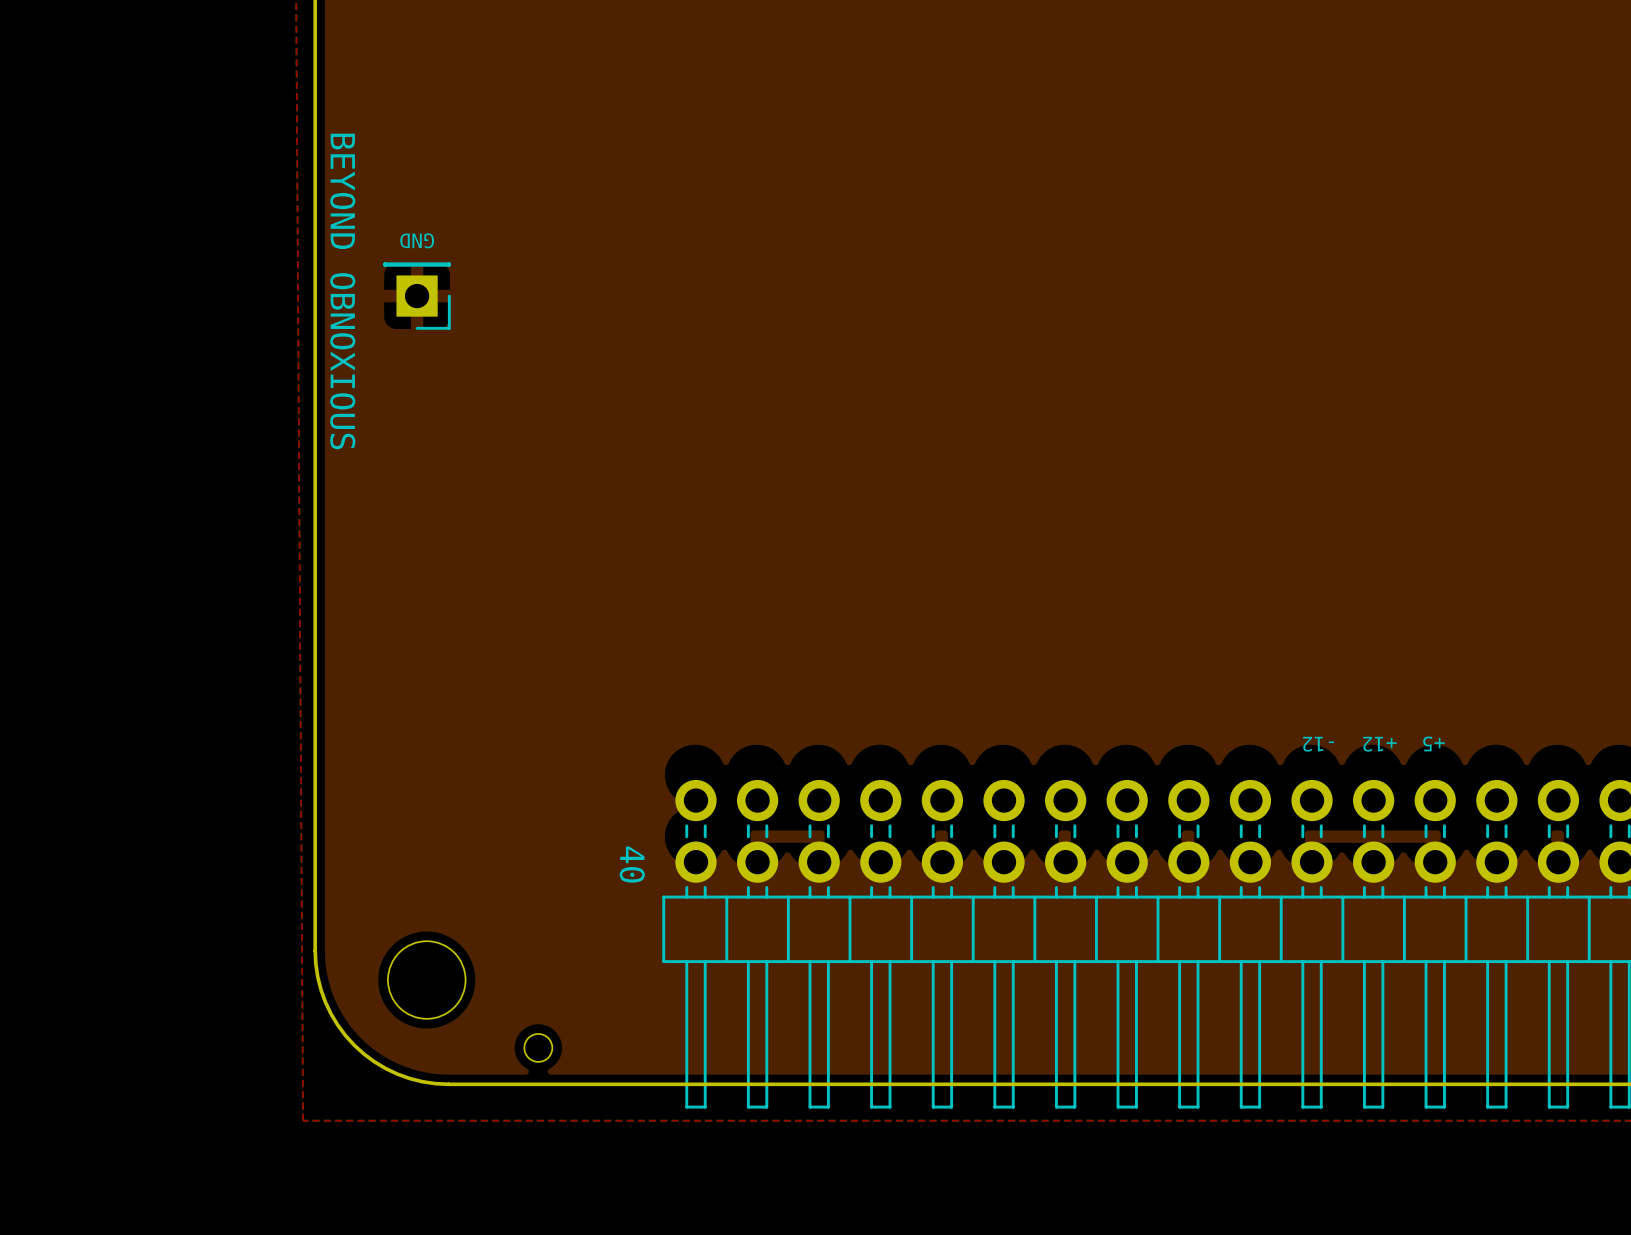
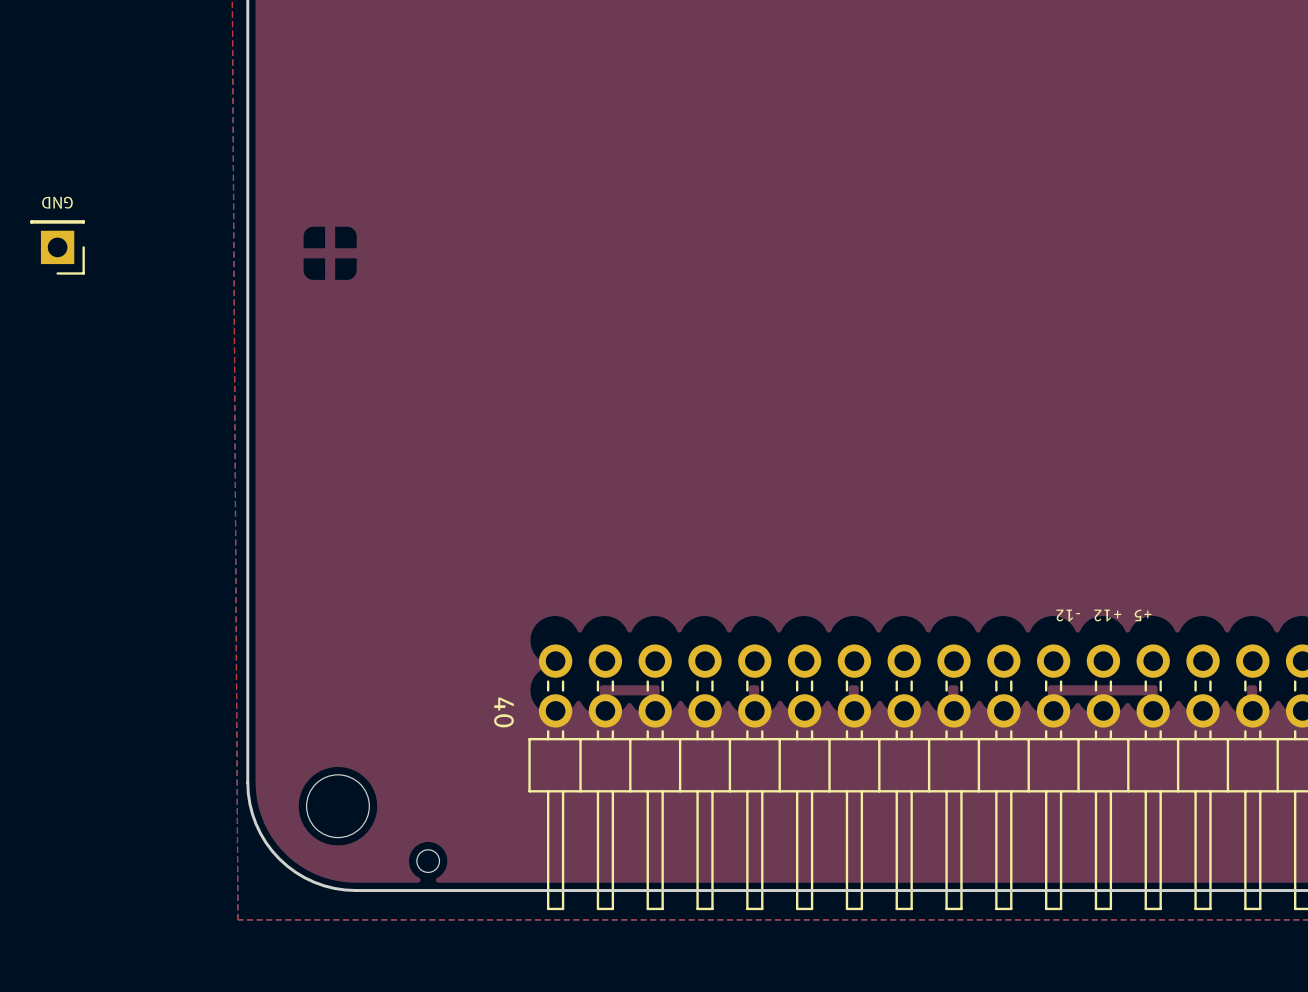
text position: GND (417, 240) -> GND (57, 202)
text: BEYOND OBNOXIOUS (342, 291) -> none
part position: (417, 296) -> (57, 247)

